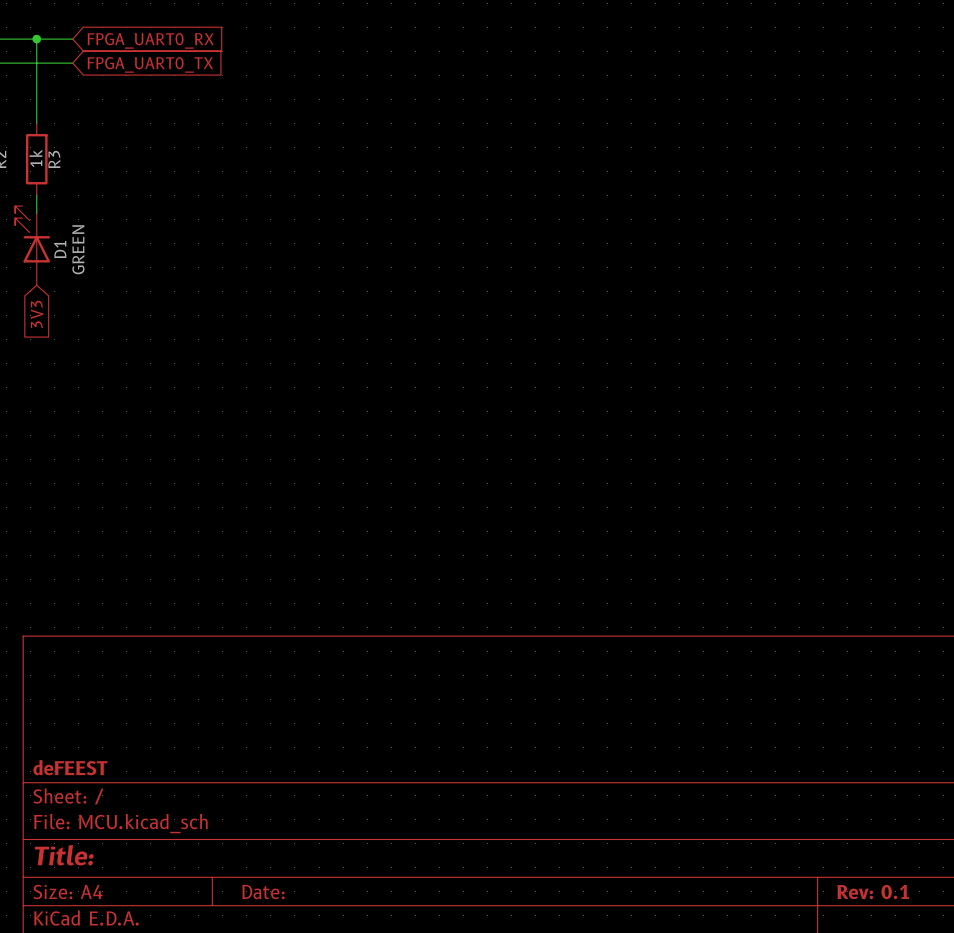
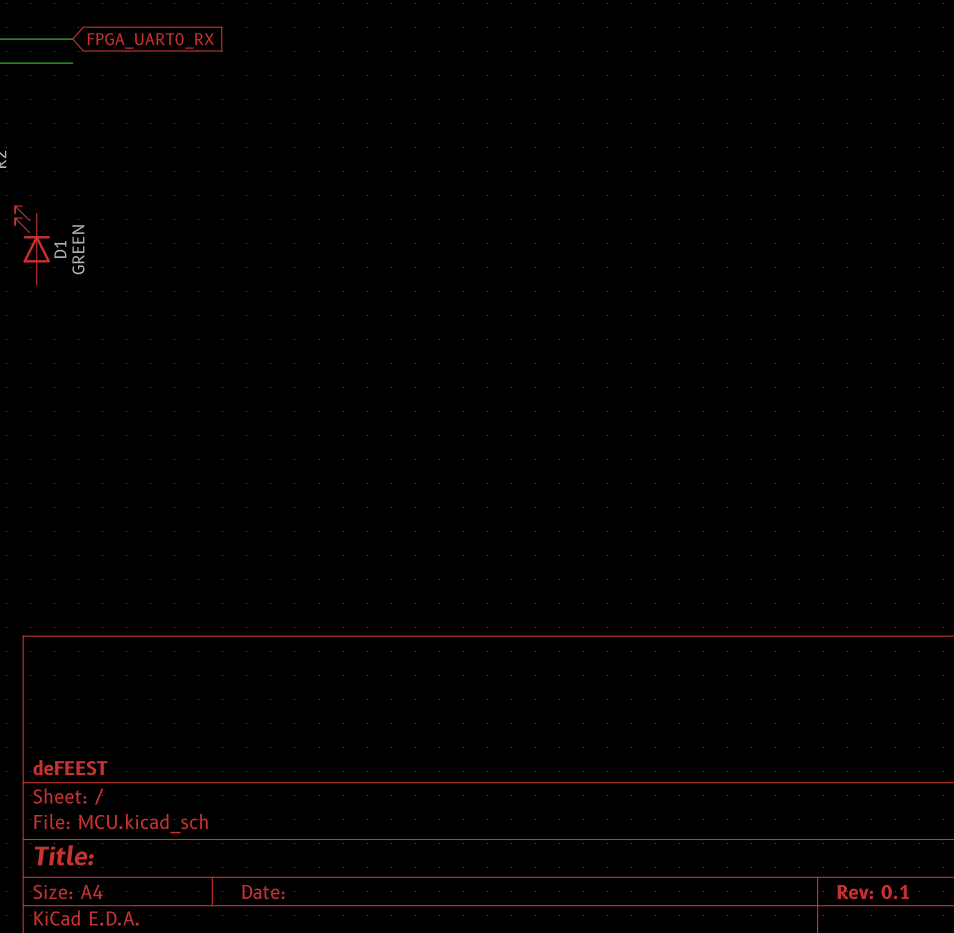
wire: (36, 39) (36, 123) -> none
junction: (36, 39) -> none
global label: FPGA_UART0_TX (150, 64) -> none
R3: 1k (36, 159) -> none
wire: (36, 195) (36, 213) -> none
global label: 3V3 (36, 314) -> none

